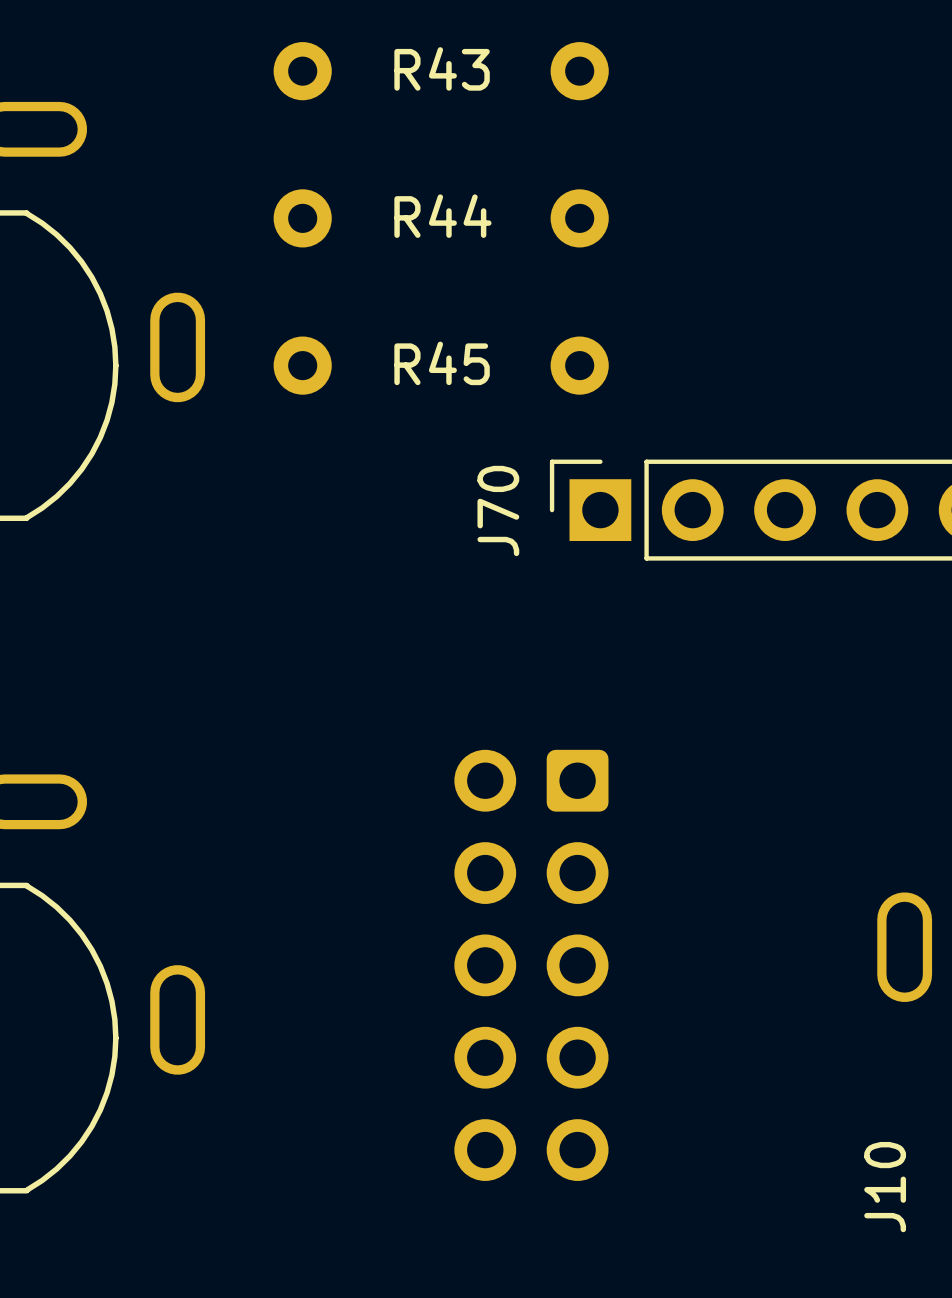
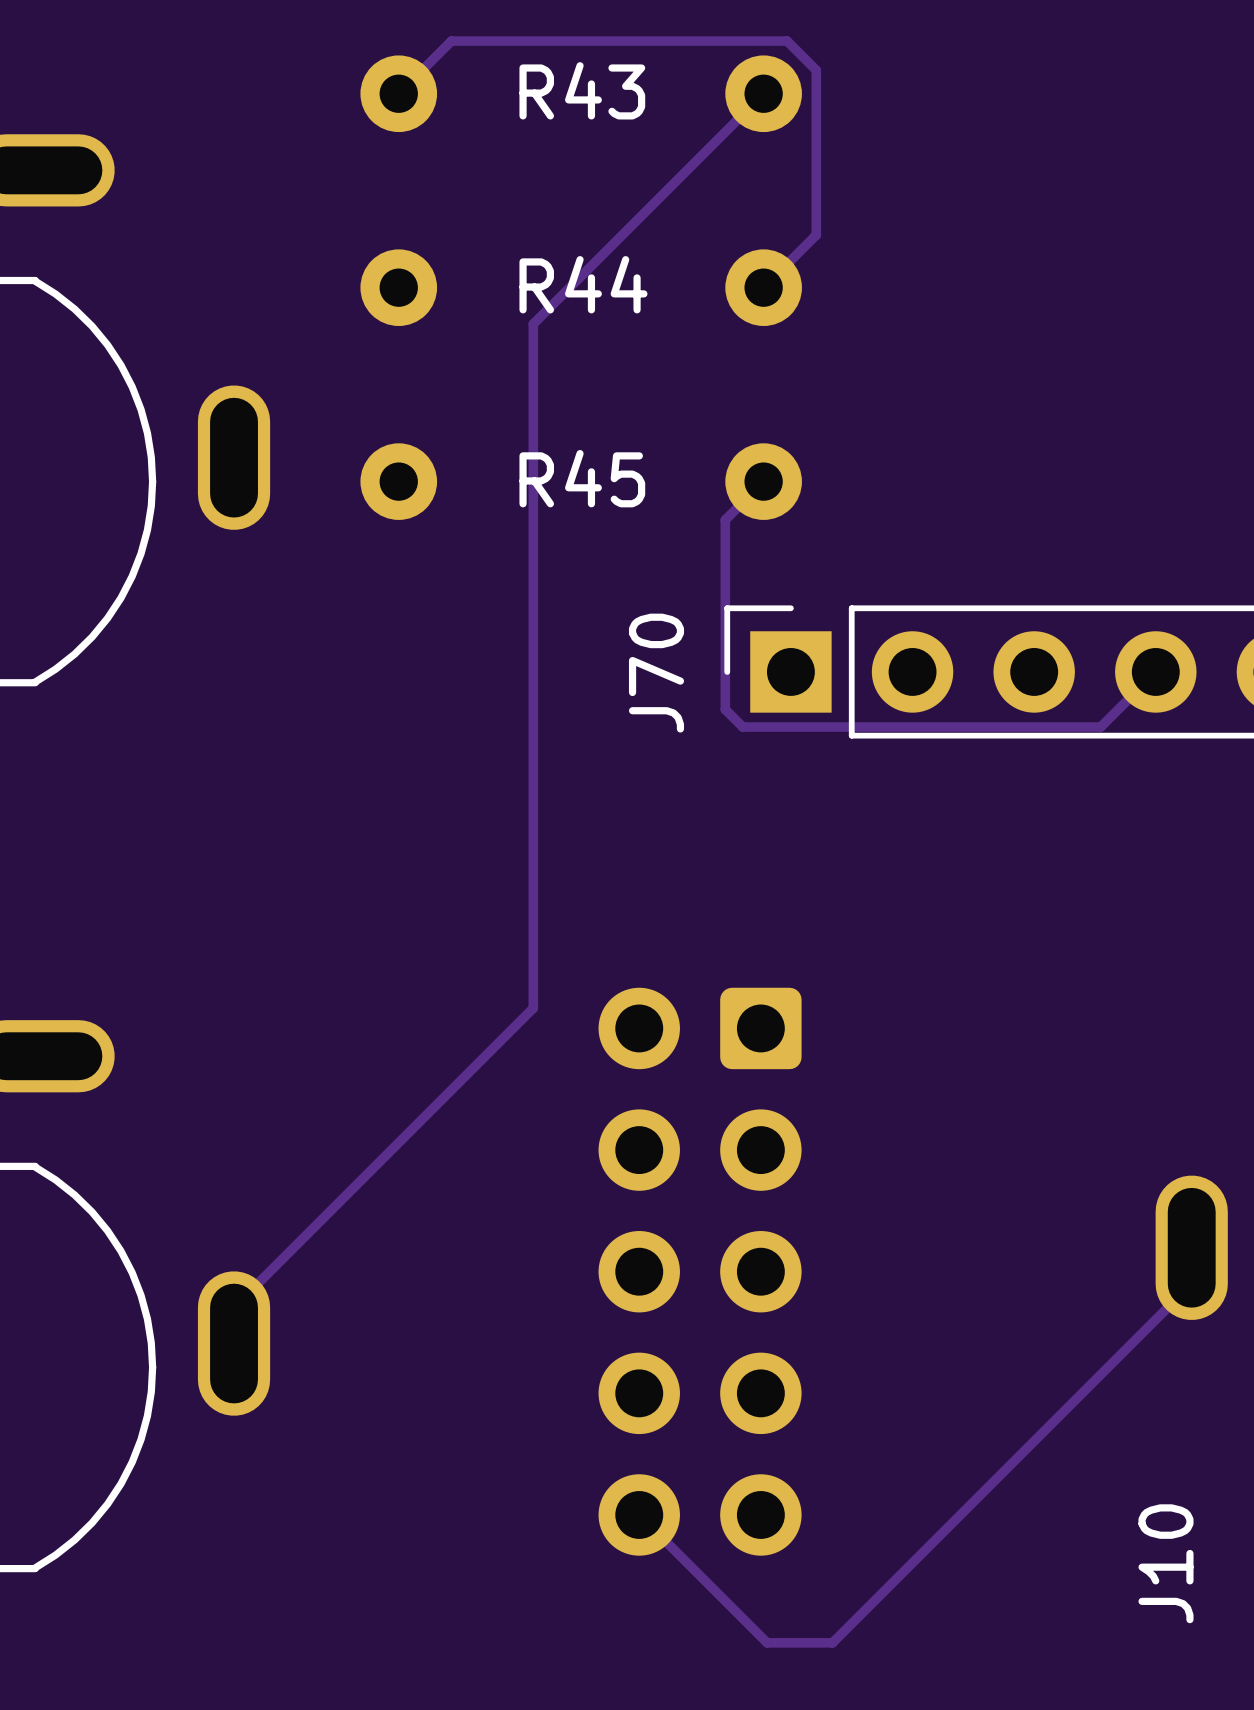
track: none -> (398, 93) (451, 41) (787, 41) (816, 70) (816, 235) (763, 287)
track: none -> (763, 93) (533, 324) (533, 1008) (234, 1307) (234, 1343)
track: none -> (763, 481) (725, 519) (725, 709) (742, 727) (1100, 727) (1155, 671)
track: none -> (1191, 1283) (832, 1642) (767, 1642) (639, 1514)

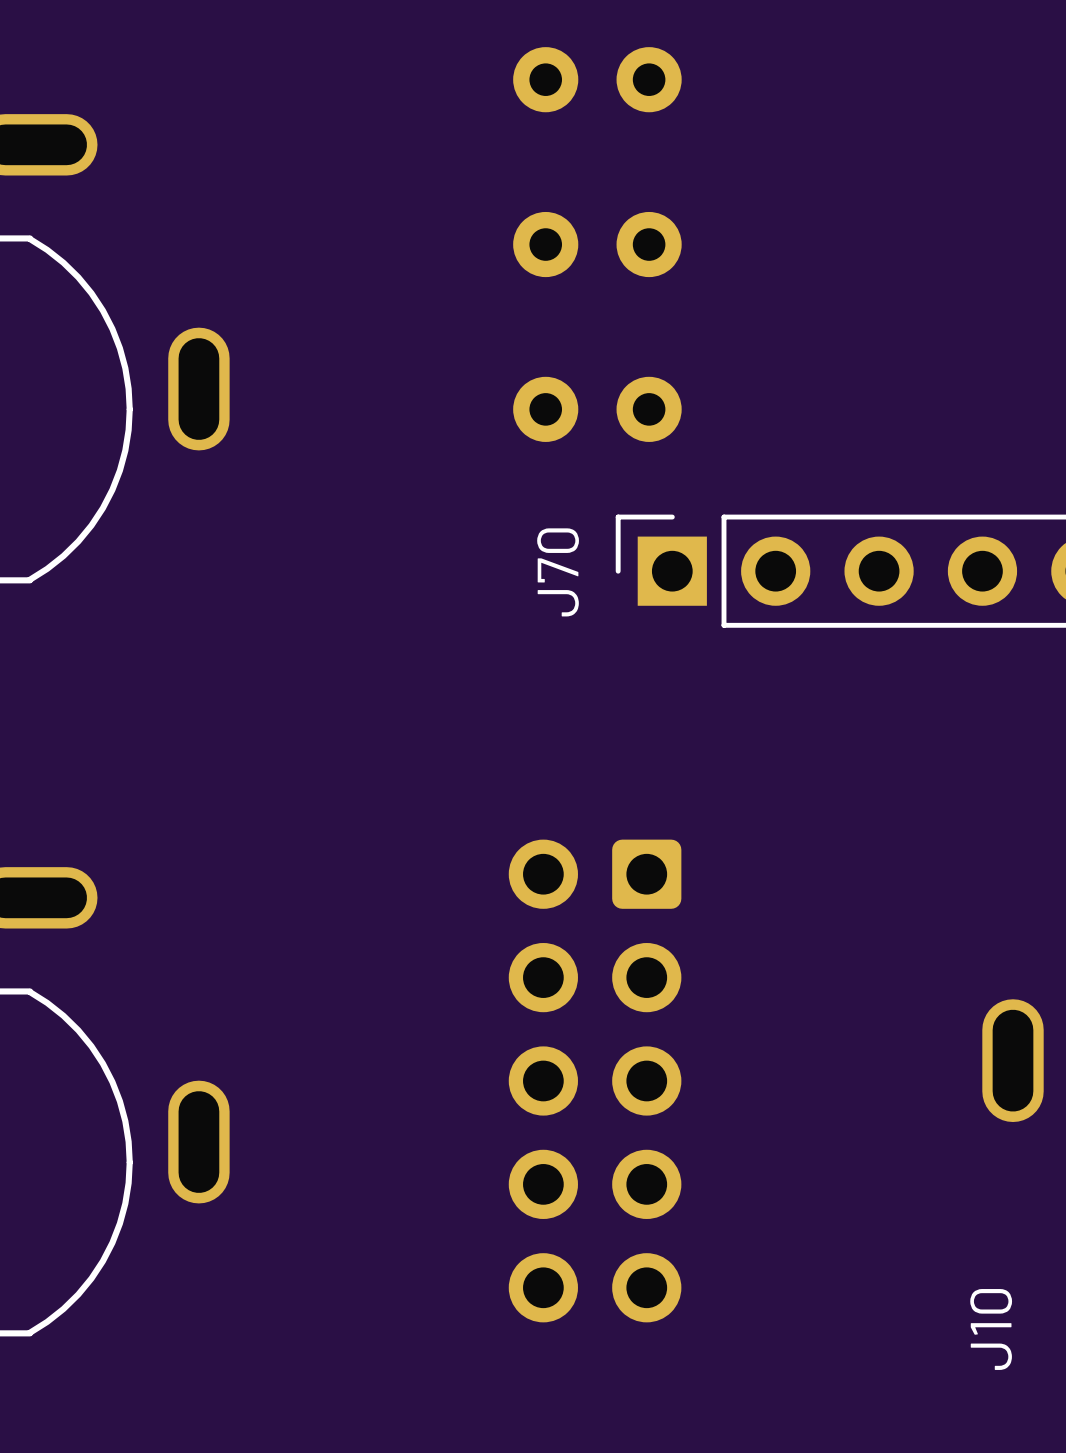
track: (398, 93) (451, 41) (787, 41) (816, 70) (816, 235) (763, 287) -> none
R43: (581, 93) -> none
part: none -> (597, 79)
track: (763, 93) (533, 324) (533, 1008) (234, 1307) (234, 1343) -> none
R44: (581, 287) -> none
part: none -> (597, 244)
R45: (581, 481) -> none
part: none -> (597, 409)
track: (763, 481) (725, 519) (725, 709) (742, 727) (1100, 727) (1155, 671) -> none
track: (1191, 1283) (832, 1642) (767, 1642) (639, 1514) -> none

